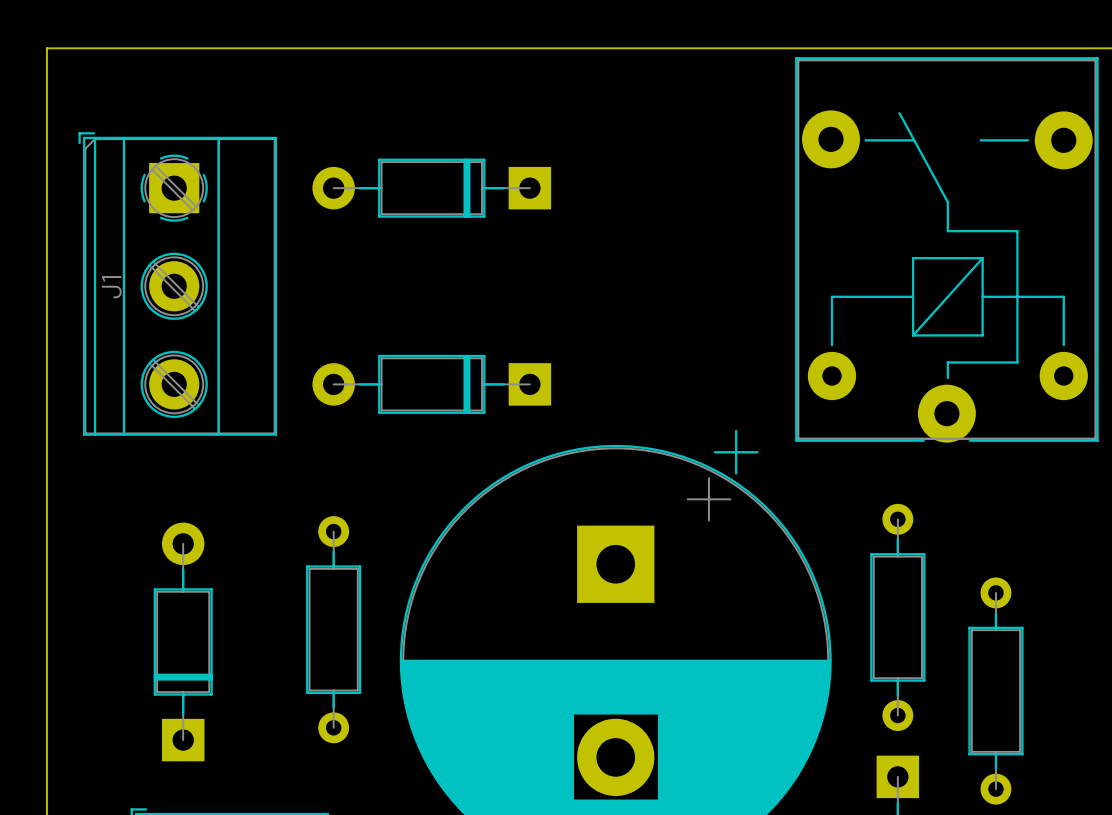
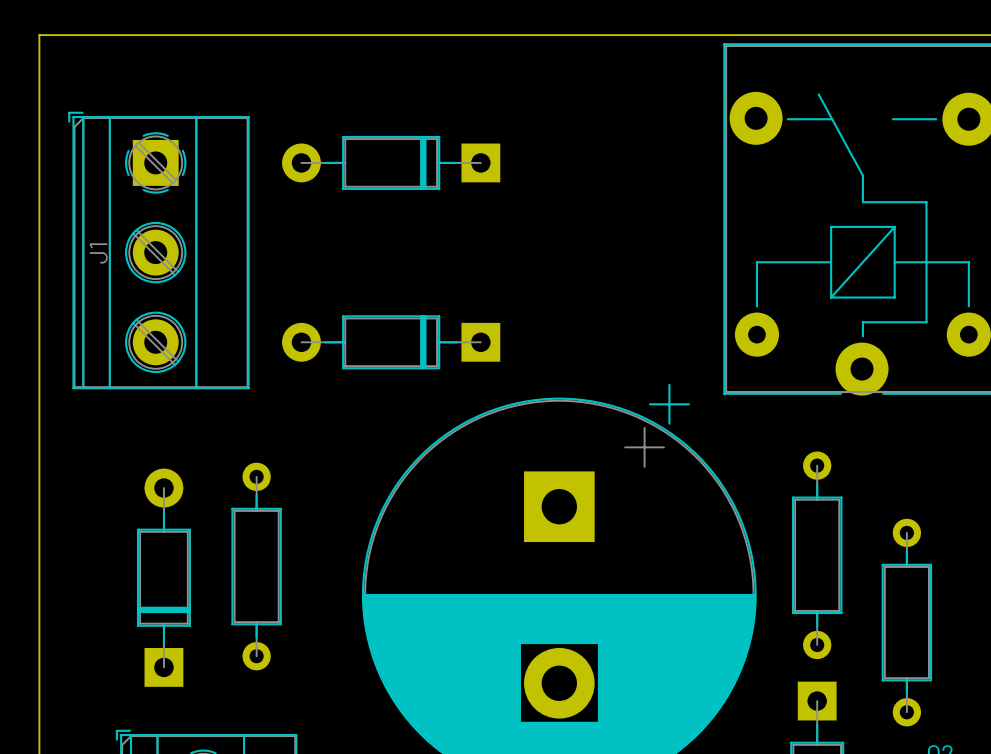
part position: (333, 629) -> (256, 566)

